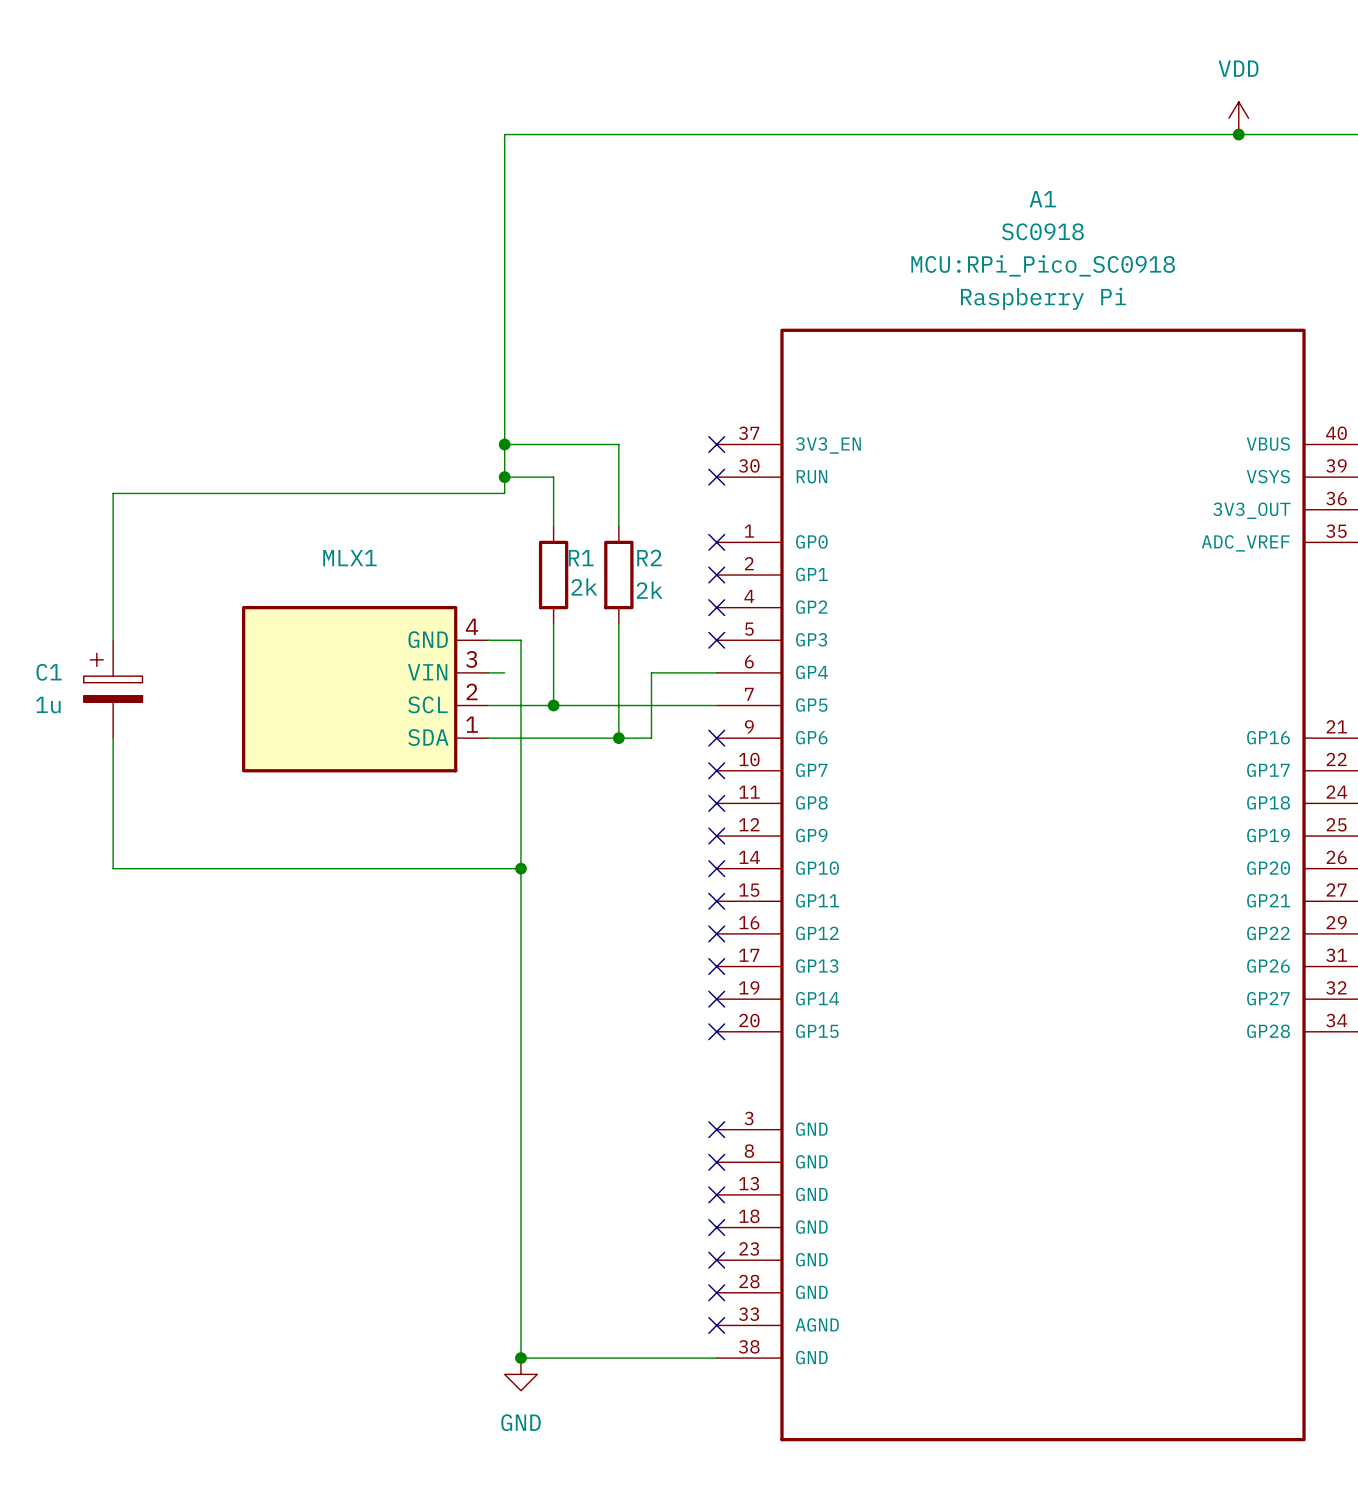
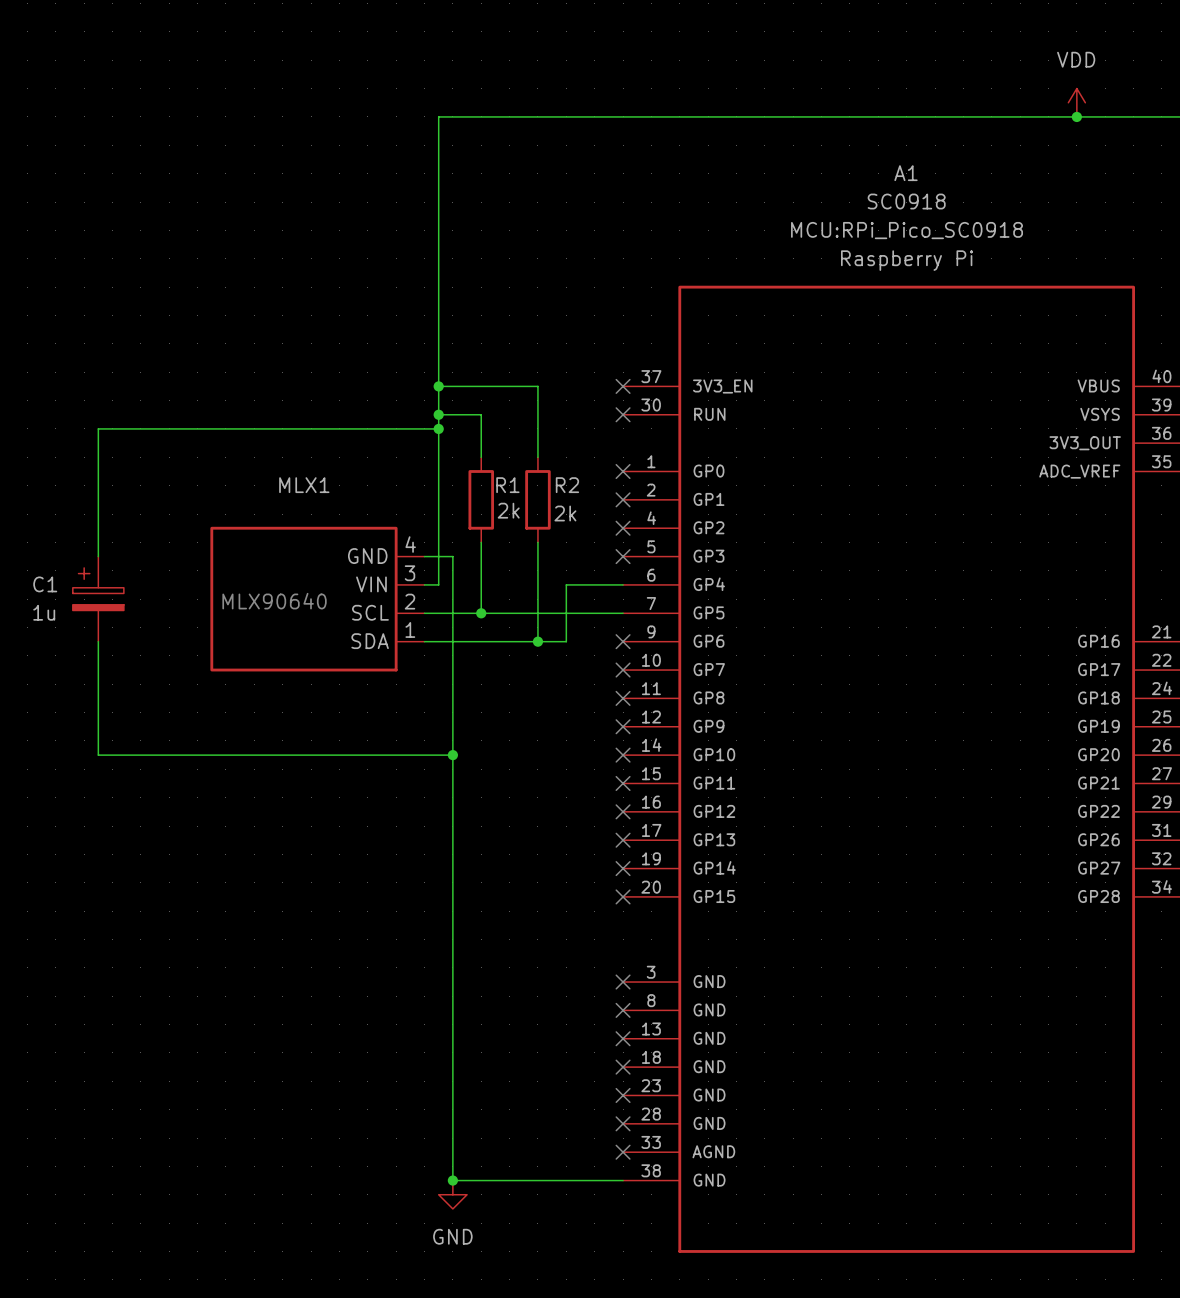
wire: none -> (438, 428) (438, 584)
junction: none -> (438, 428)
text: none -> MLX90640 (274, 601)

